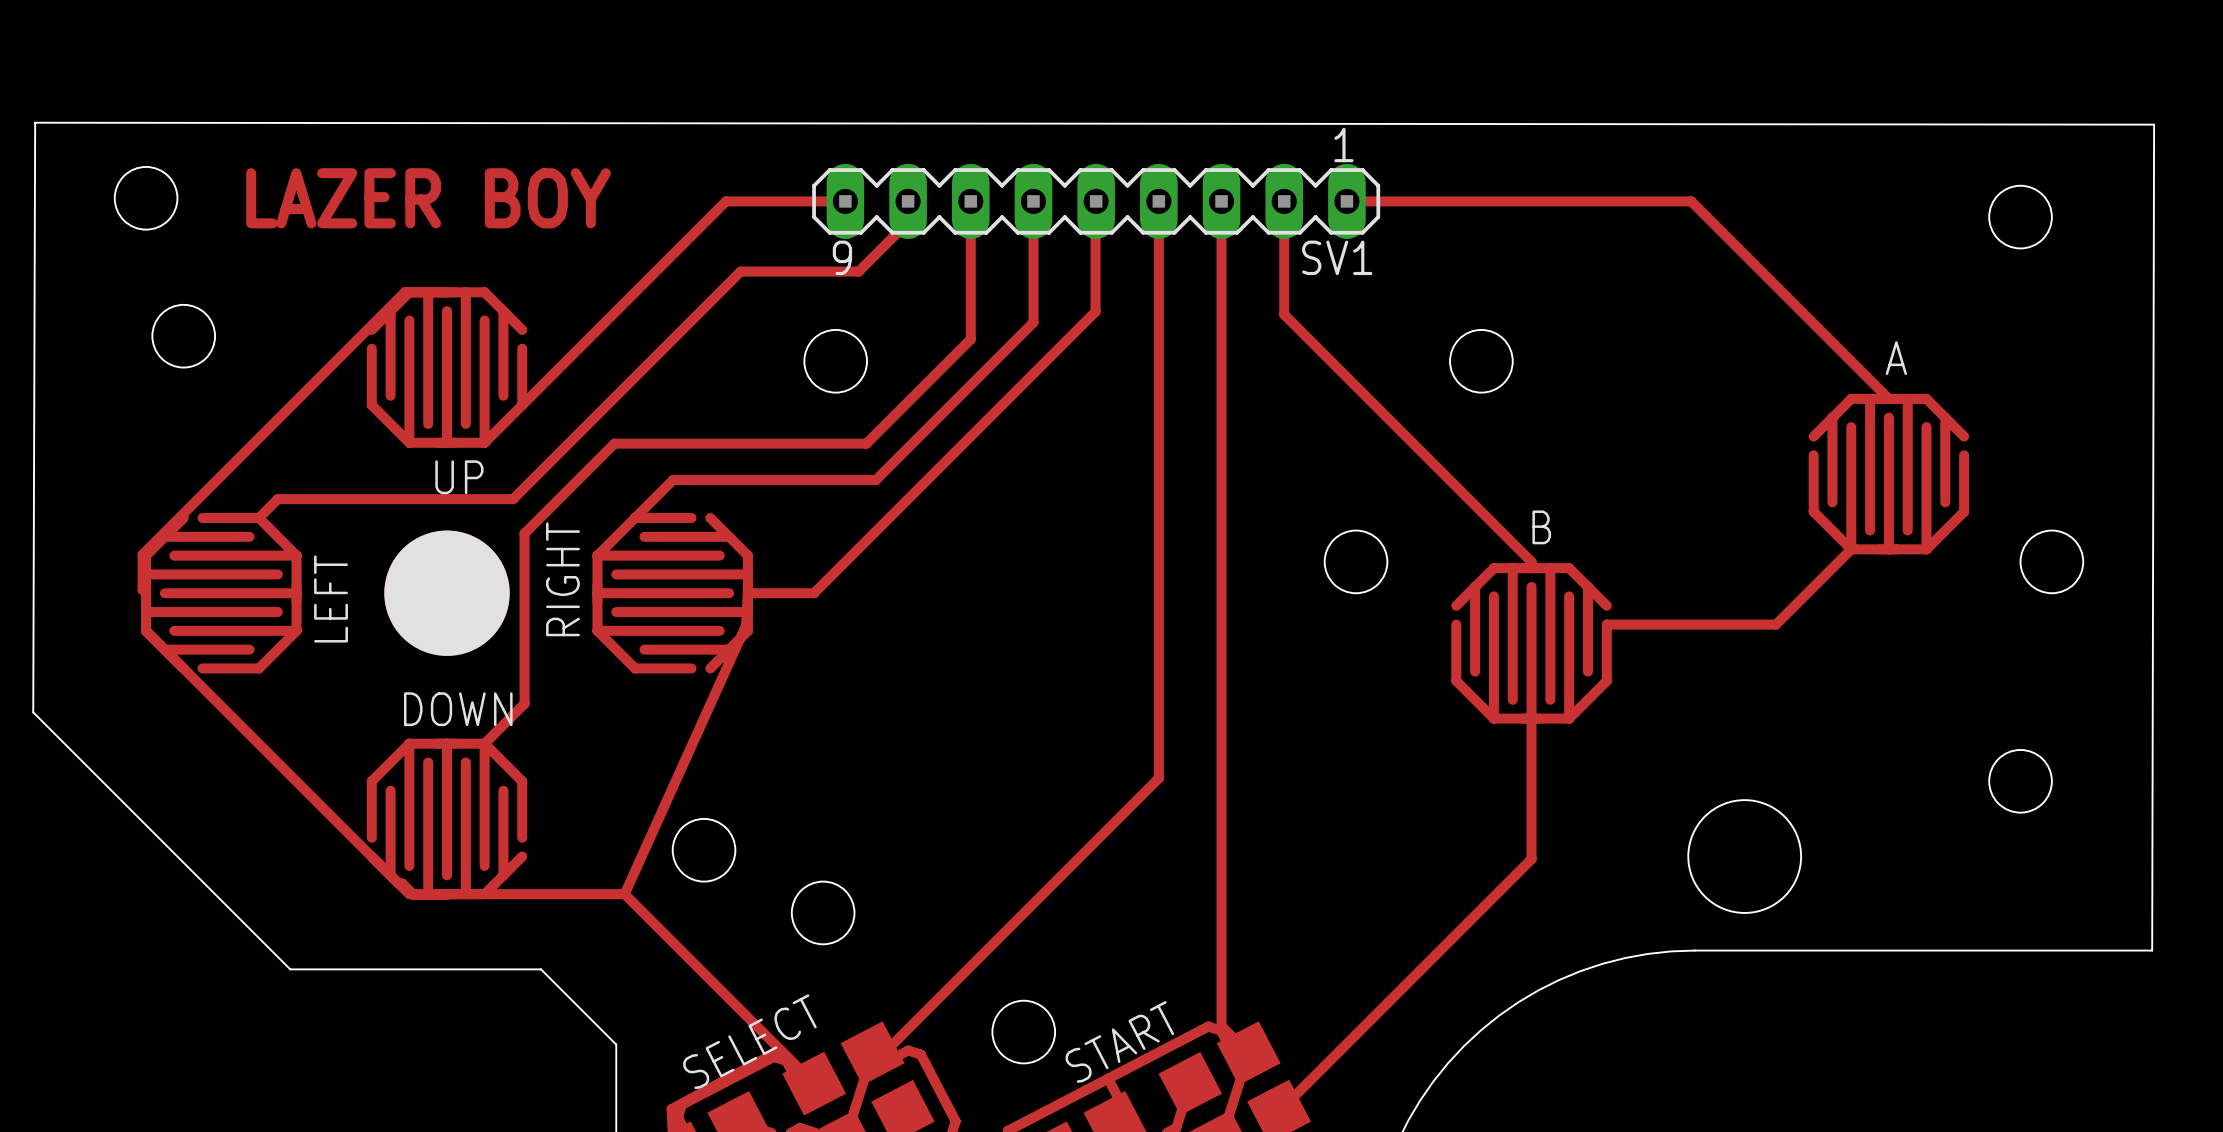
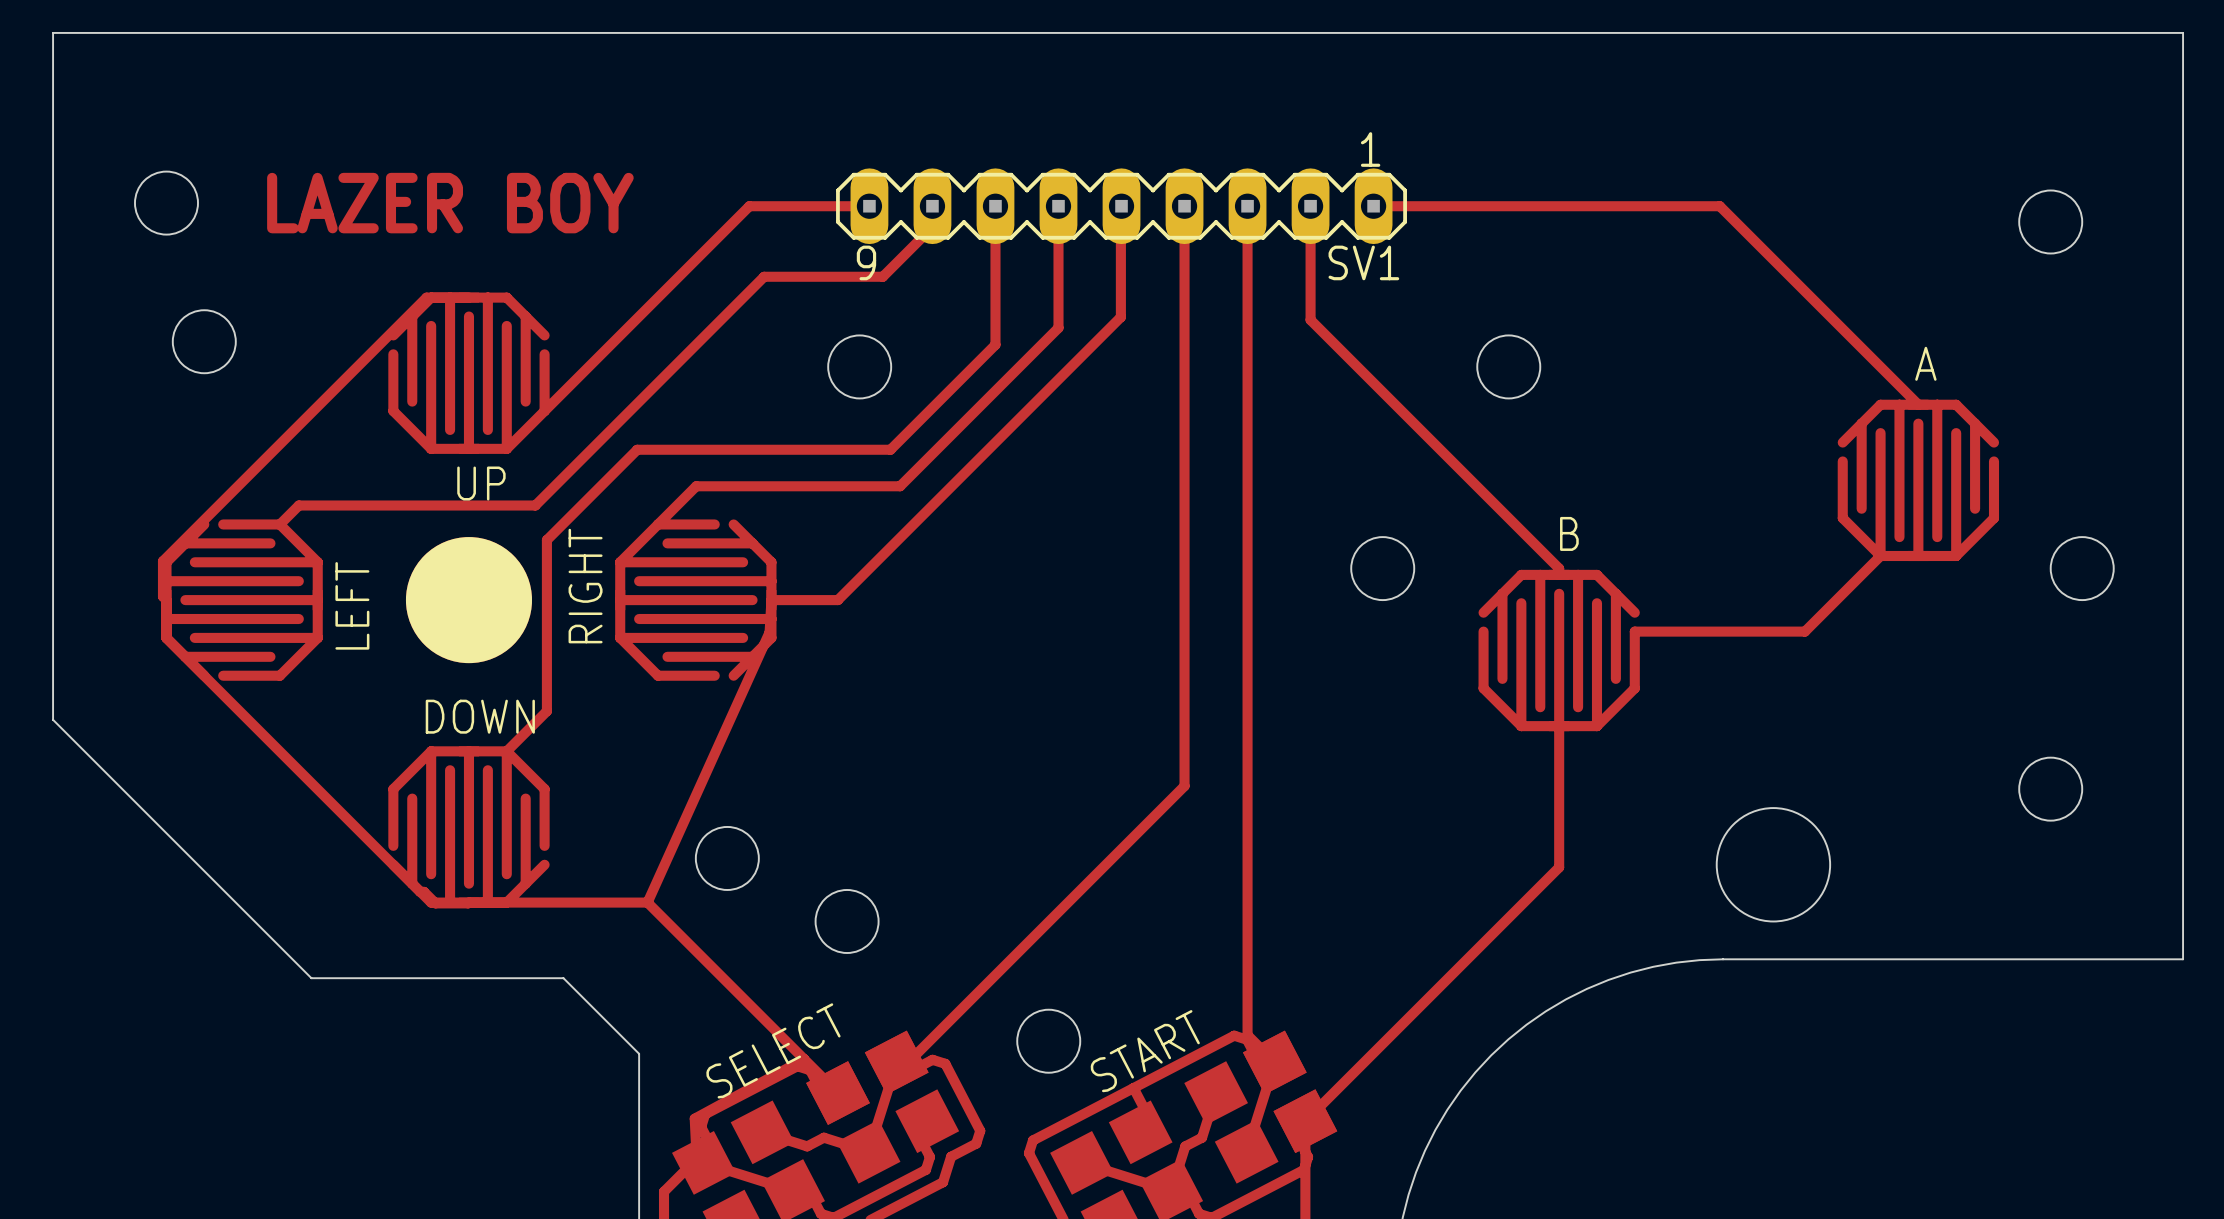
board edge: (33, 712) (35, 122) (2154, 124) (2152, 950) -> (53, 719) (53, 32) (2183, 32) (2183, 959)

